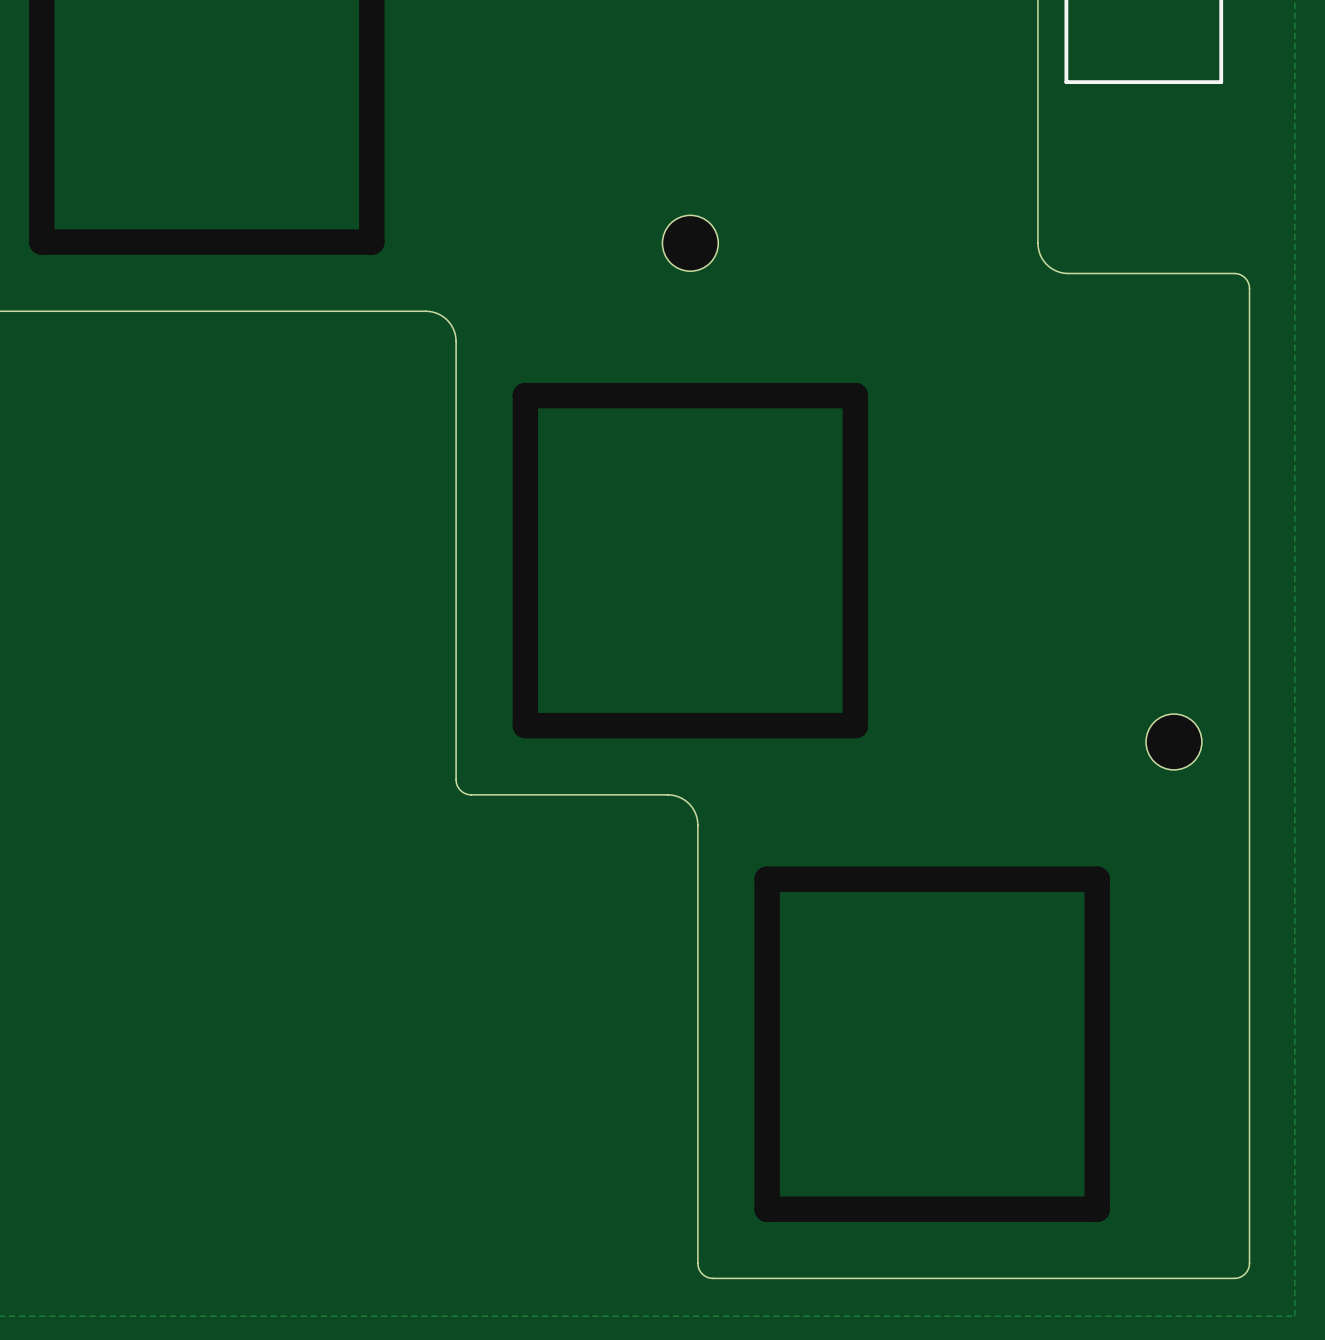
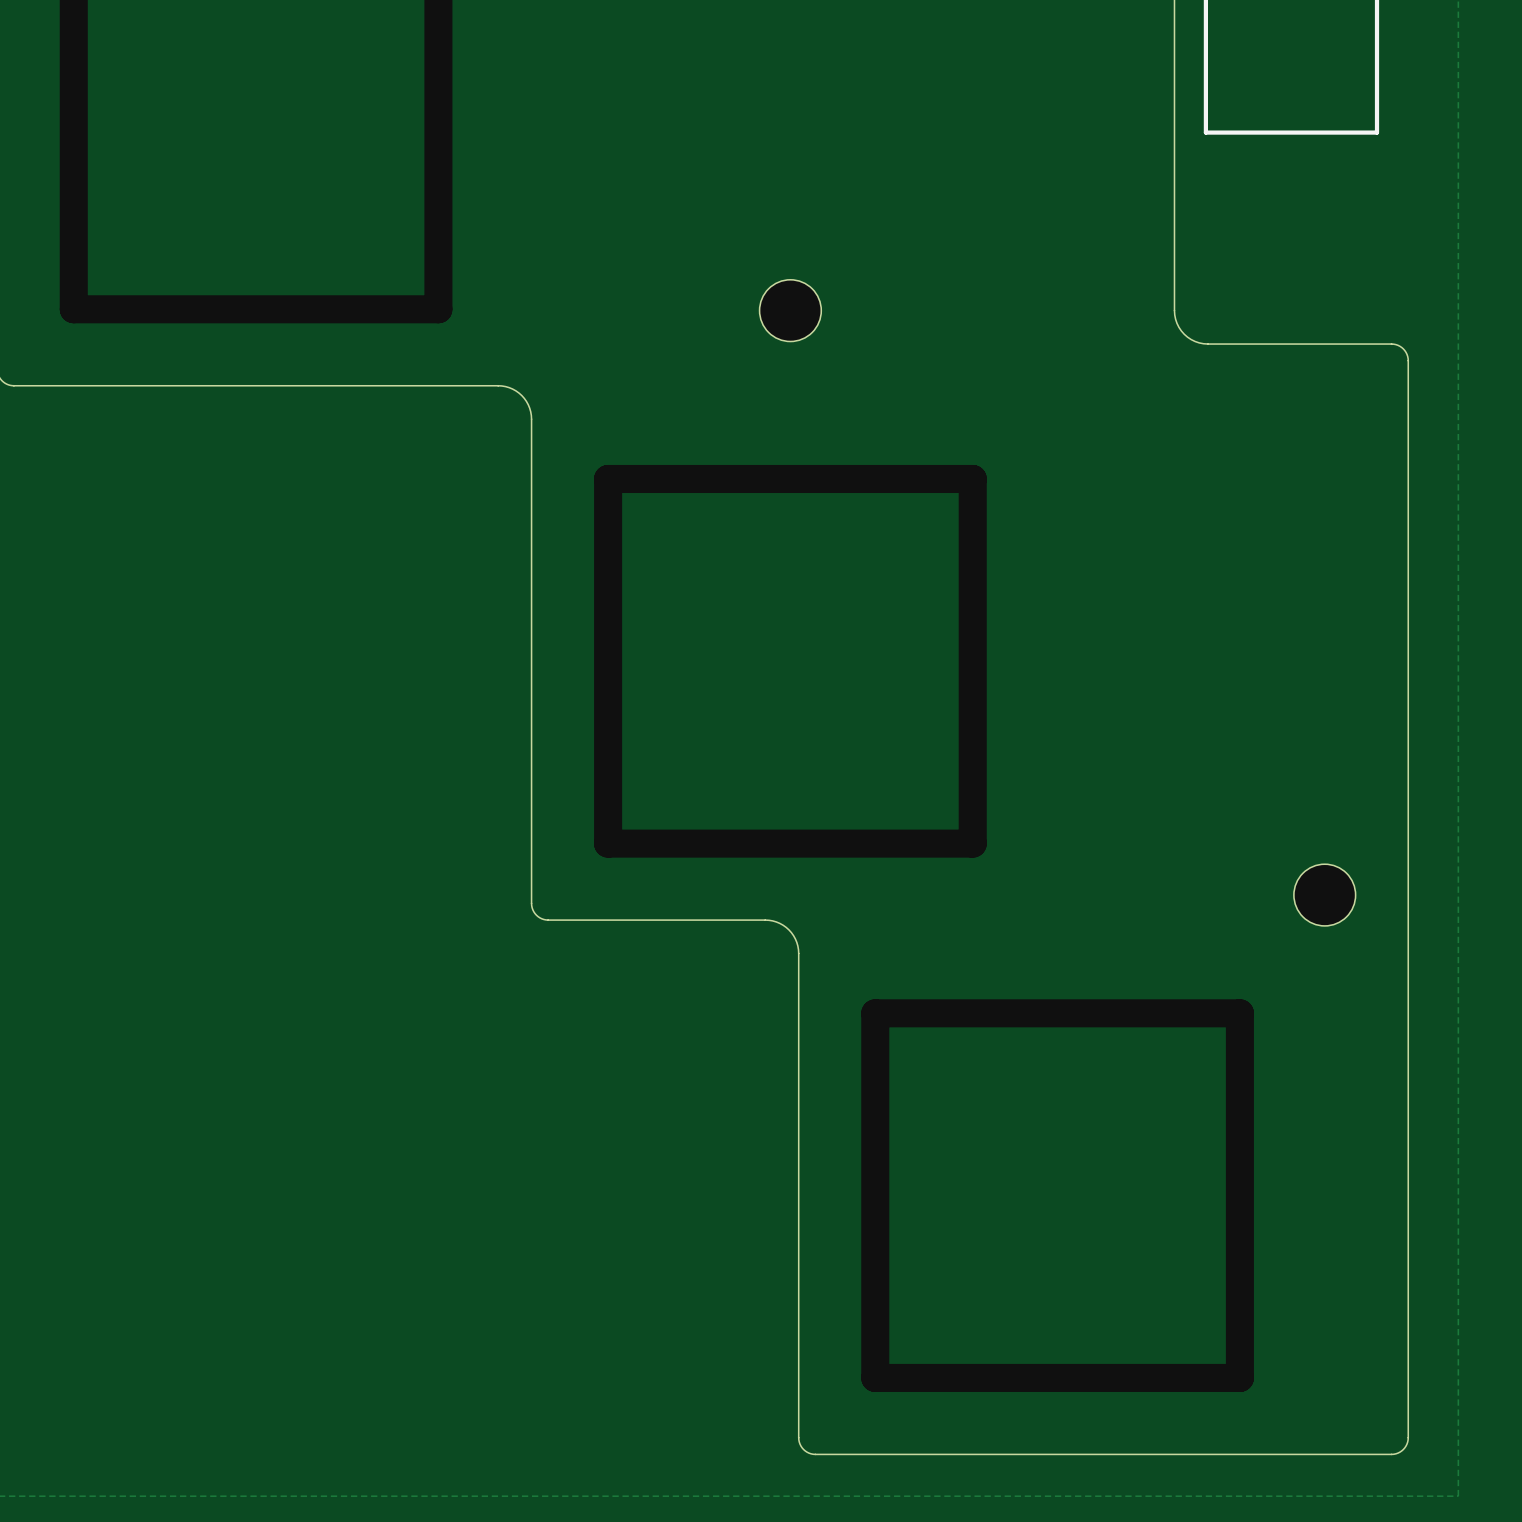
part position: (1173, 741) -> (1324, 895)

